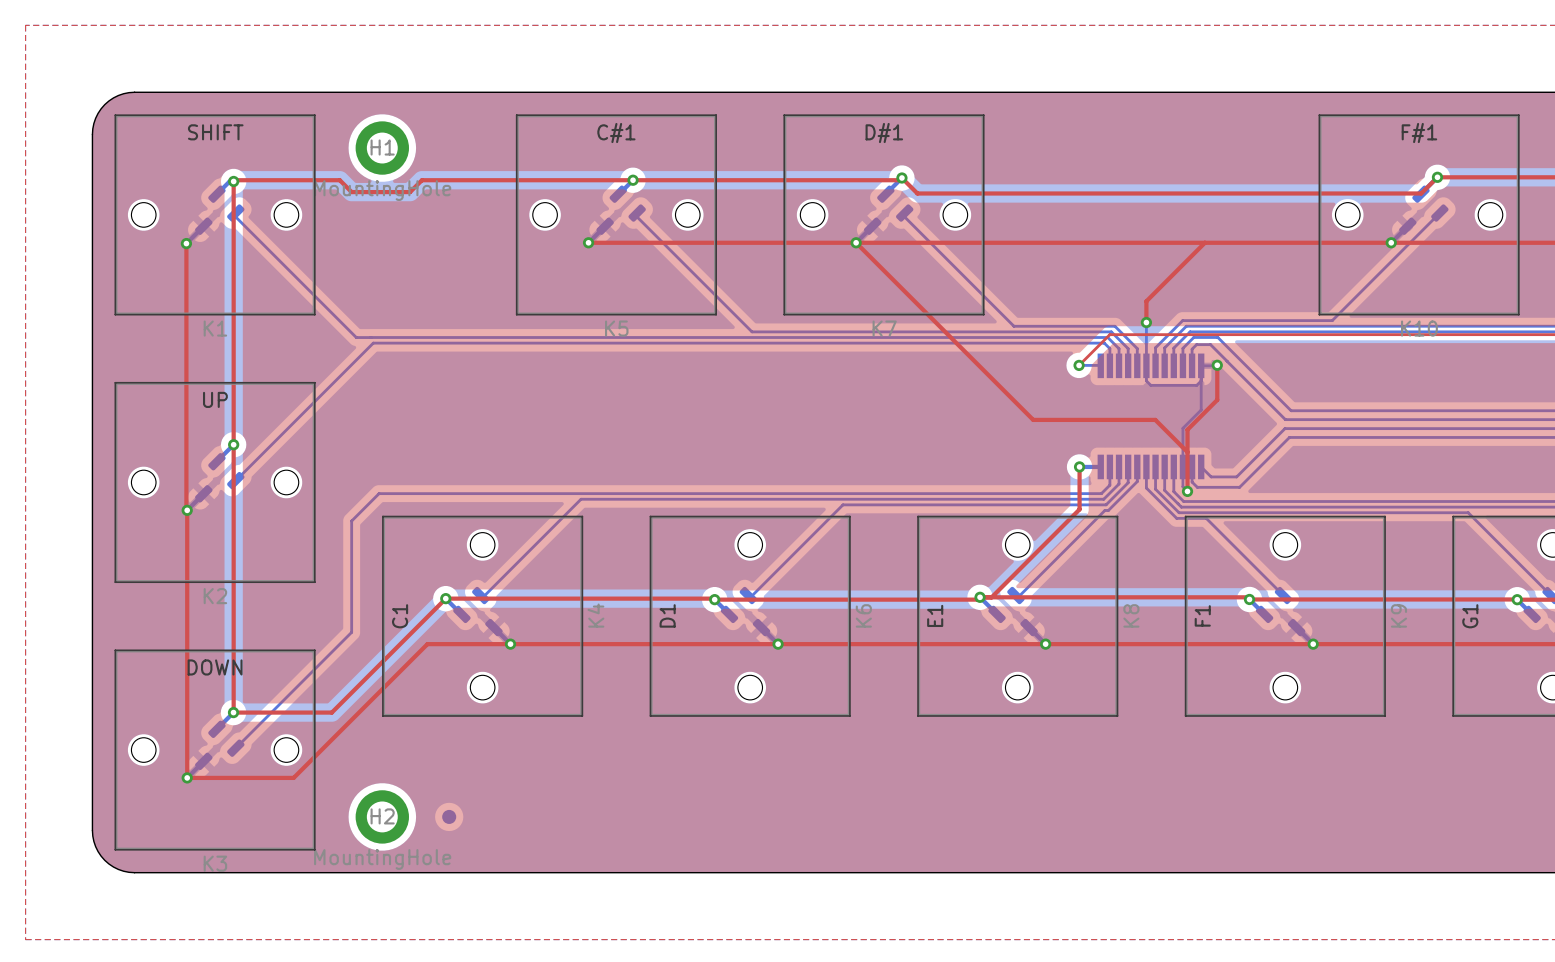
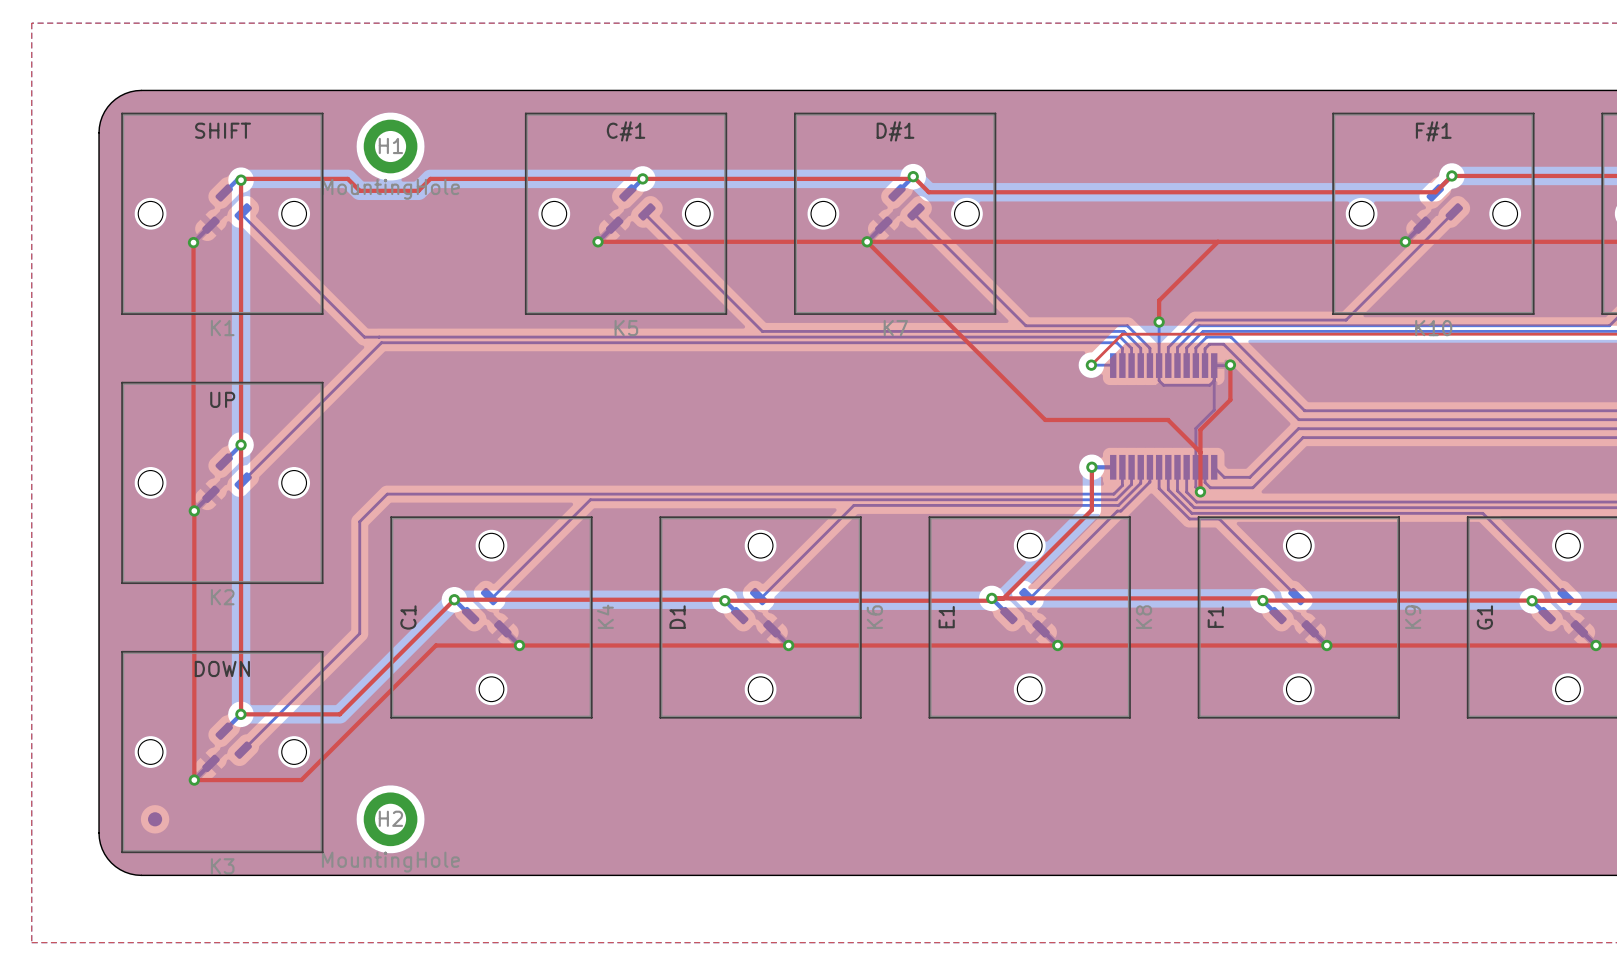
part position: (449, 816) -> (155, 819)

